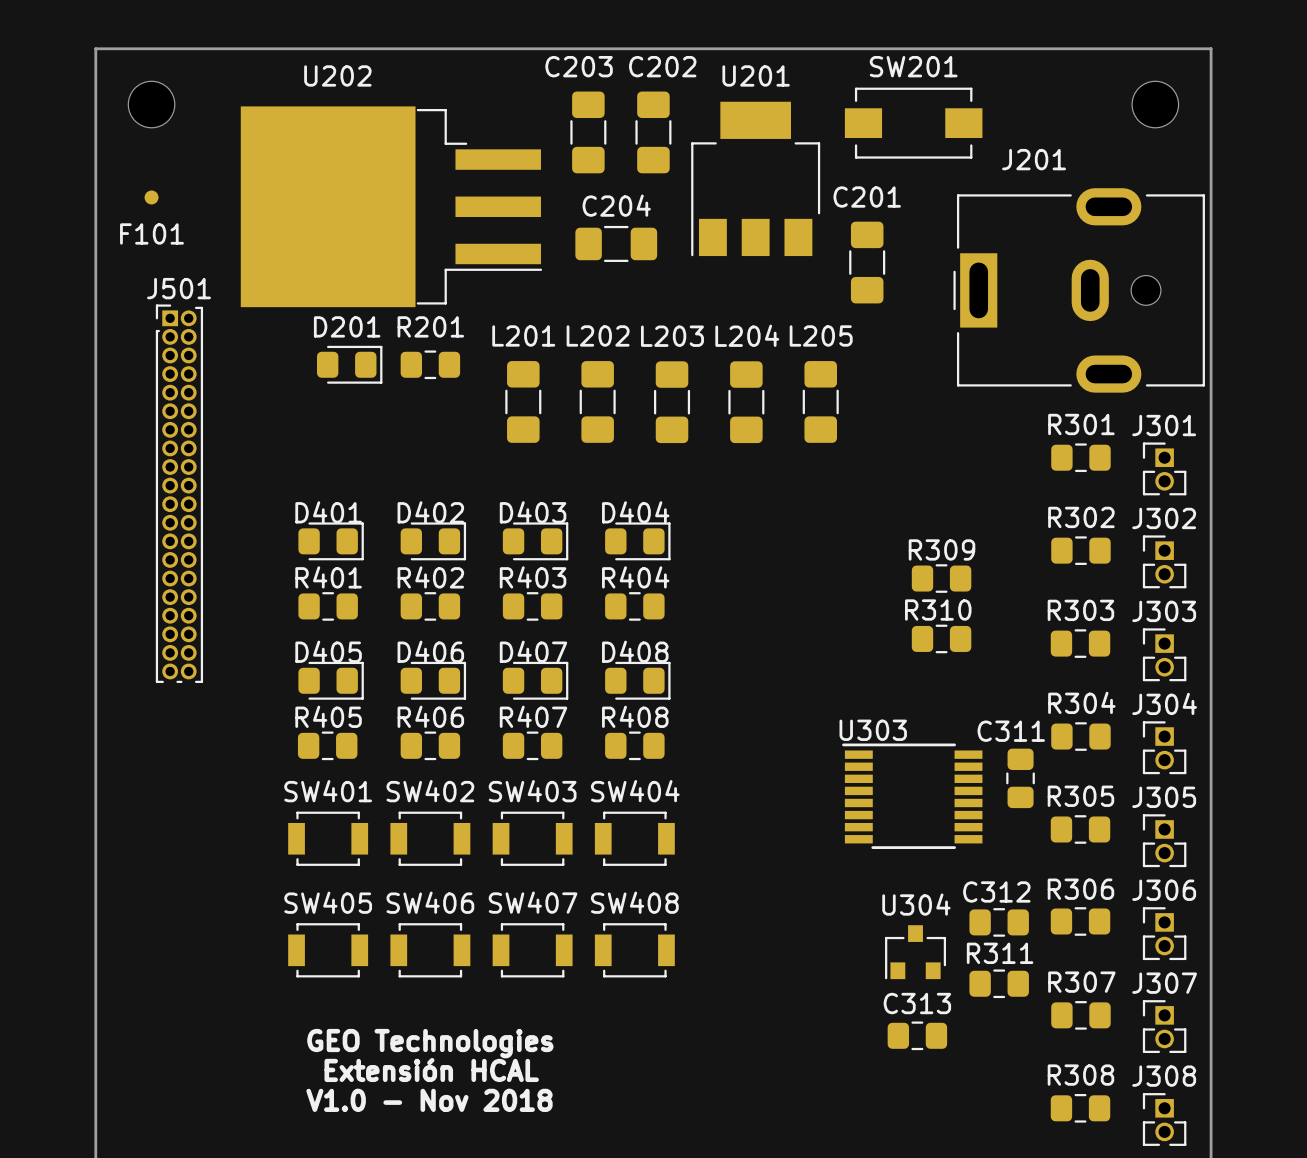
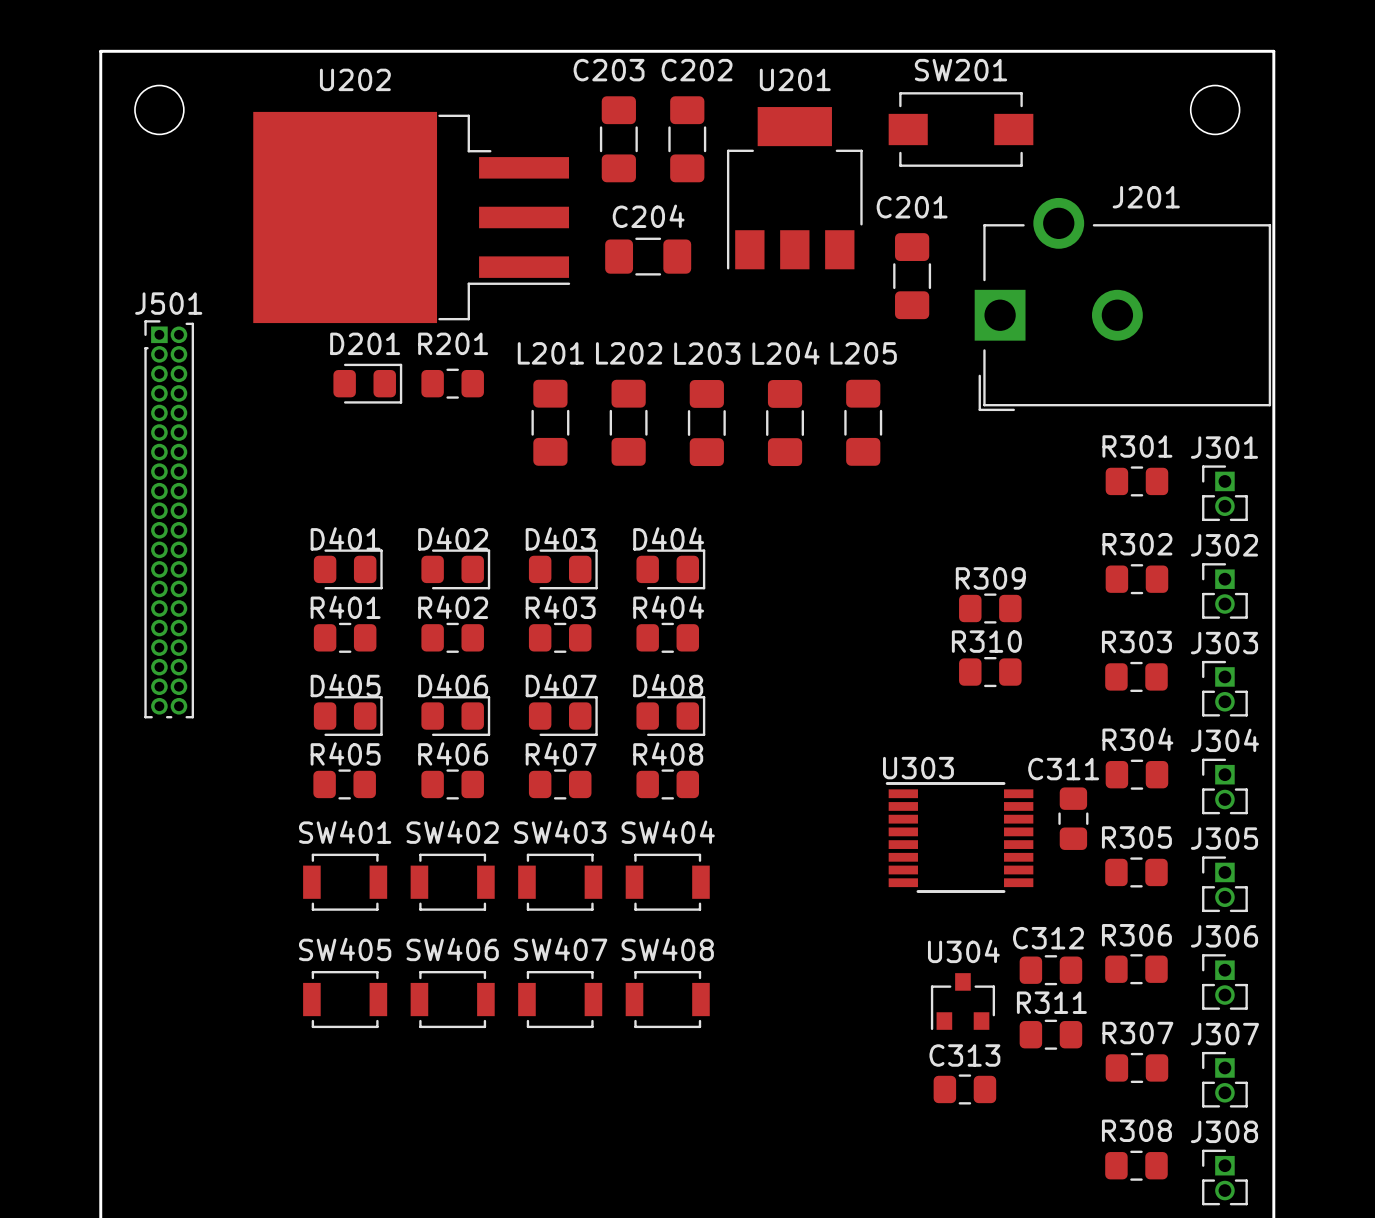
J201 name position: J201 (1034, 159) -> J201 (1146, 197)
J201 footprint: [953, 188, 1205, 393] -> [974, 197, 1272, 412]
F101: (151, 197) -> none
J501 position: (179, 493) -> (169, 519)
text: GEO Technologies (430, 1043) -> none
text: Extensión HCAL (431, 1069) -> none
text: V1.0 - Nov 2018 (429, 1100) -> none

